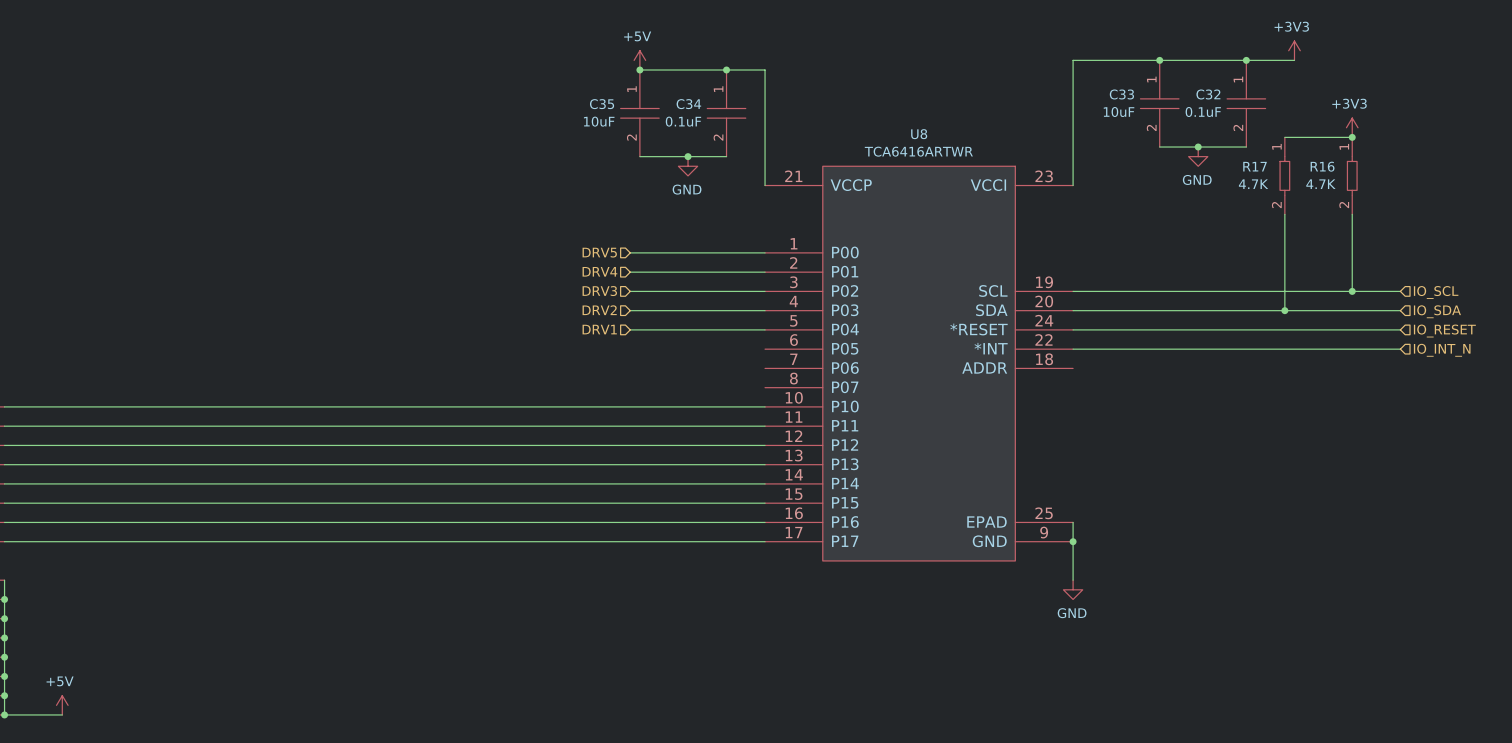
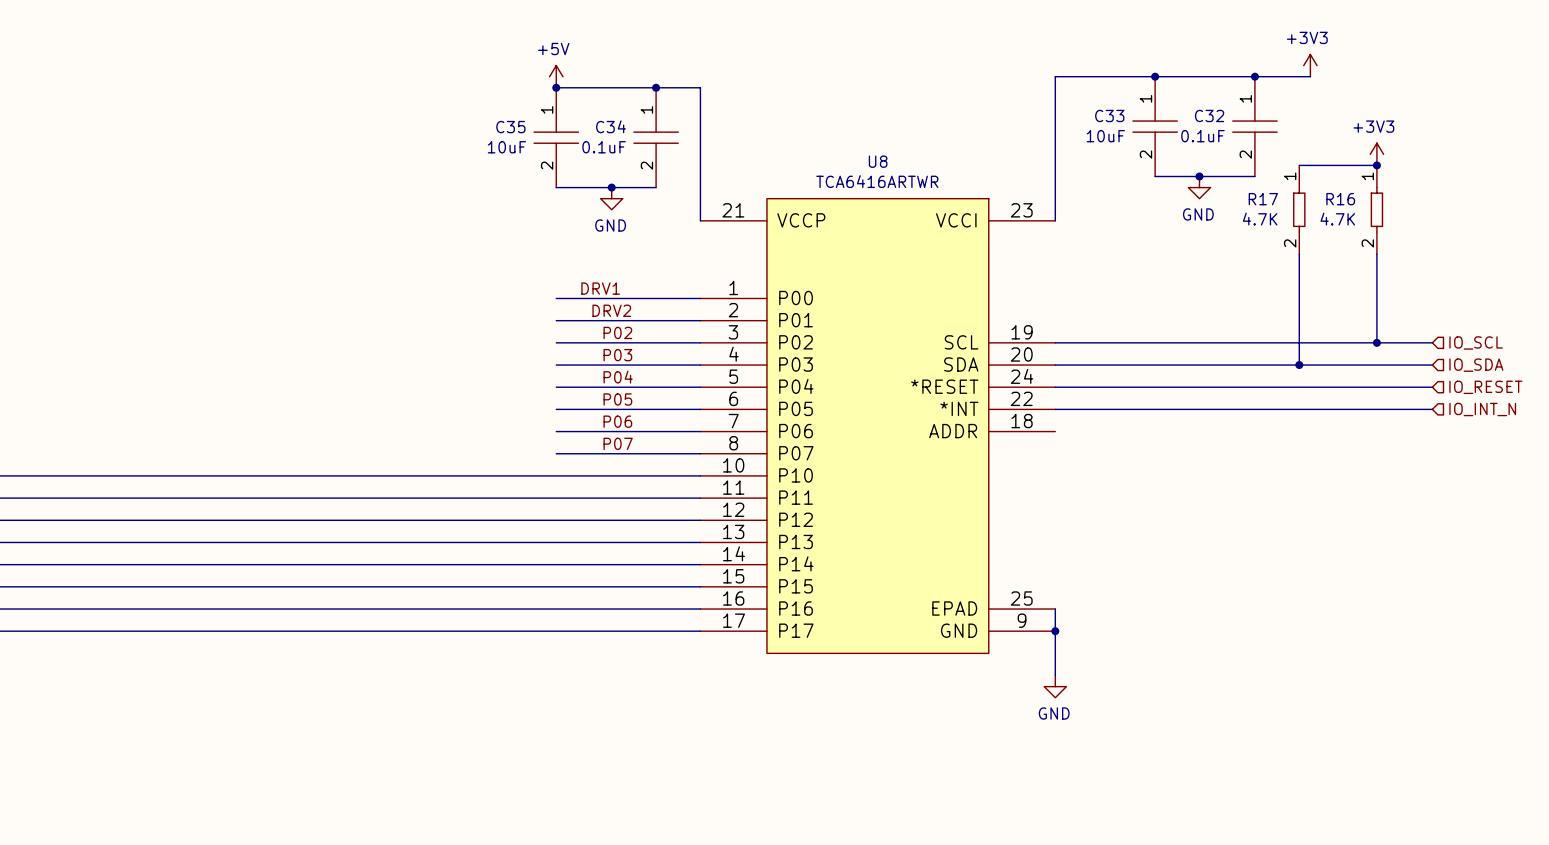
label: none -> DRV1 (600, 288)
hierarchical label: DRV5 (599, 252) -> none
wire: (630, 252) (639, 252) -> none
label: none -> DRV2 (611, 310)
hierarchical label: DRV4 (599, 271) -> none
wire: (630, 272) (639, 272) -> none
label: none -> P02 (617, 332)
hierarchical label: DRV3 (599, 291) -> none
wire: (630, 291) (639, 291) -> none
label: none -> P03 (617, 355)
hierarchical label: DRV2 (599, 310) -> none
wire: (630, 310) (639, 310) -> none
label: none -> P04 (618, 377)
hierarchical label: DRV1 (599, 329) -> none
wire: (630, 329) (639, 329) -> none
label: none -> P05 (617, 399)
wire: none -> (556, 409) (700, 409)
label: none -> P06 (617, 421)
wire: none -> (556, 431) (700, 431)
label: none -> P07 (618, 443)
wire: none -> (556, 453) (700, 453)

